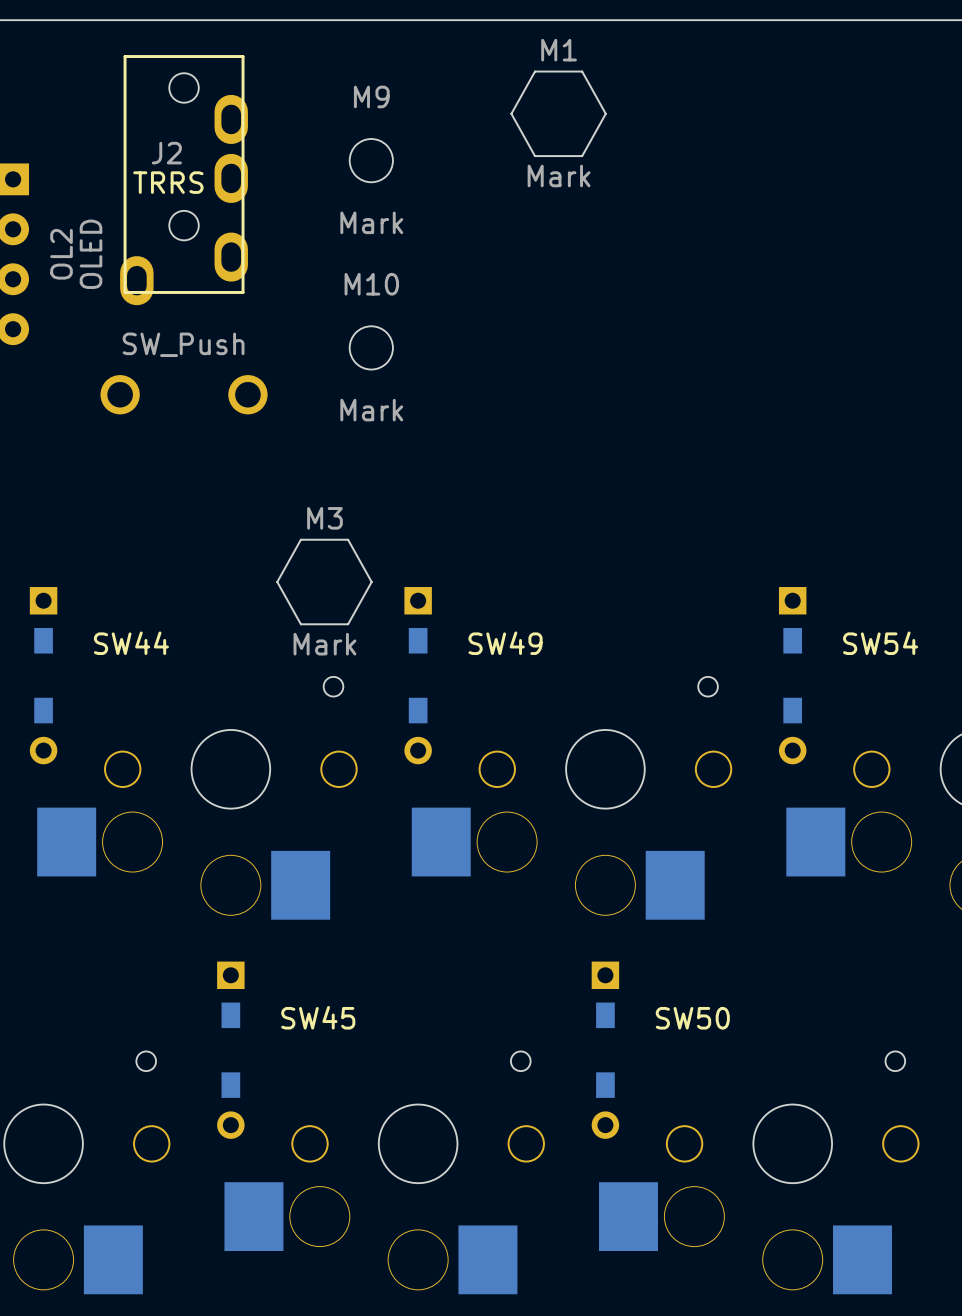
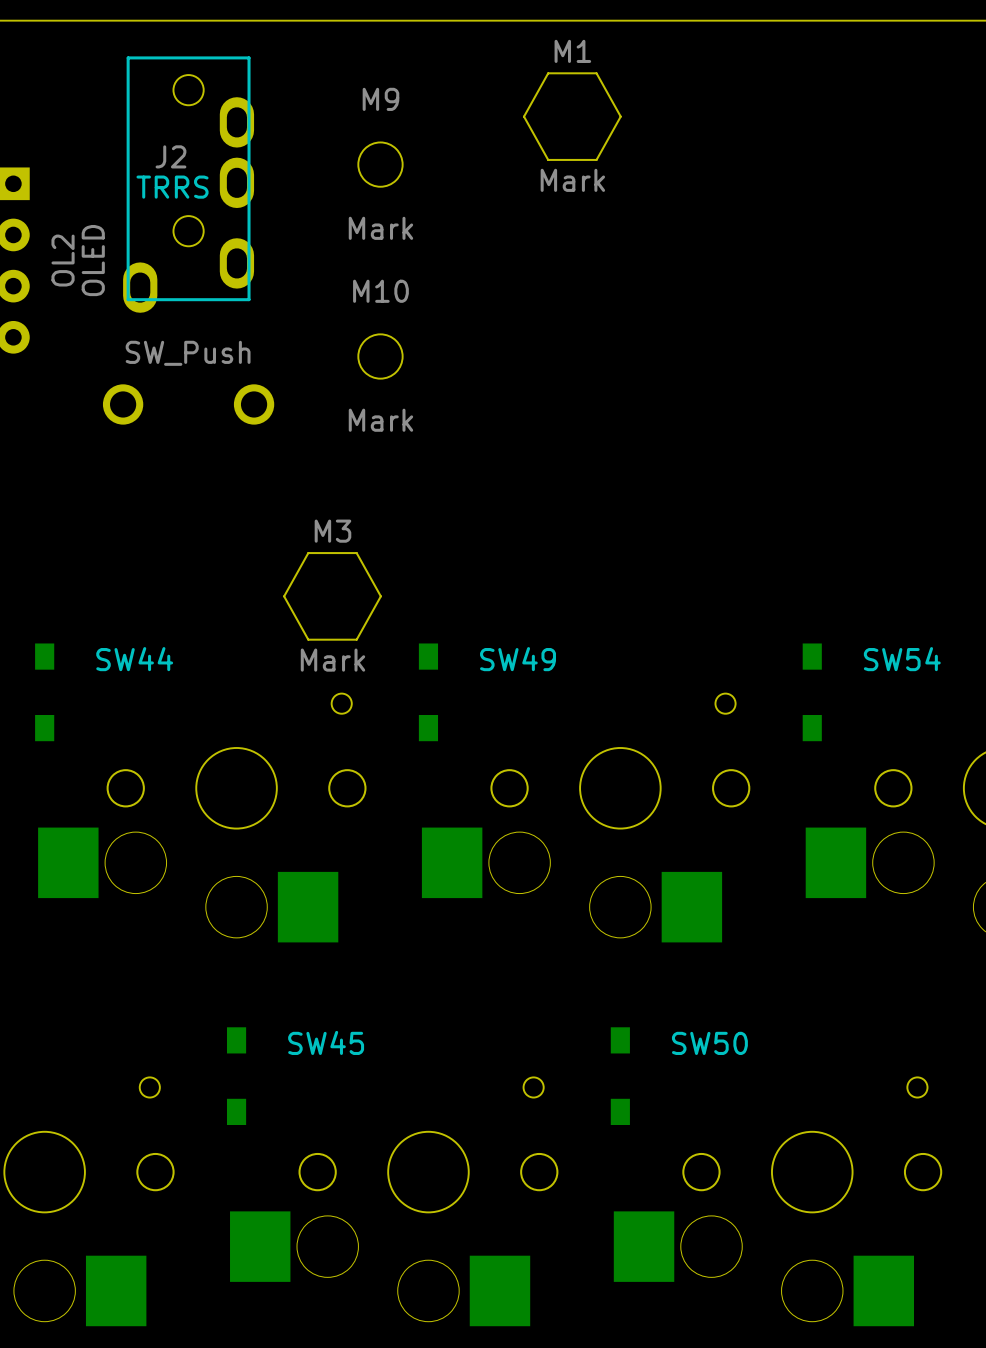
part footprint: [29, 587, 58, 765] -> [35, 643, 55, 742]
part footprint: [404, 587, 432, 765] -> [418, 643, 439, 742]
part footprint: [778, 587, 807, 765] -> [802, 643, 822, 742]
part footprint: [217, 961, 245, 1139] -> [226, 1027, 247, 1125]
part footprint: [591, 961, 620, 1139] -> [610, 1027, 630, 1125]

